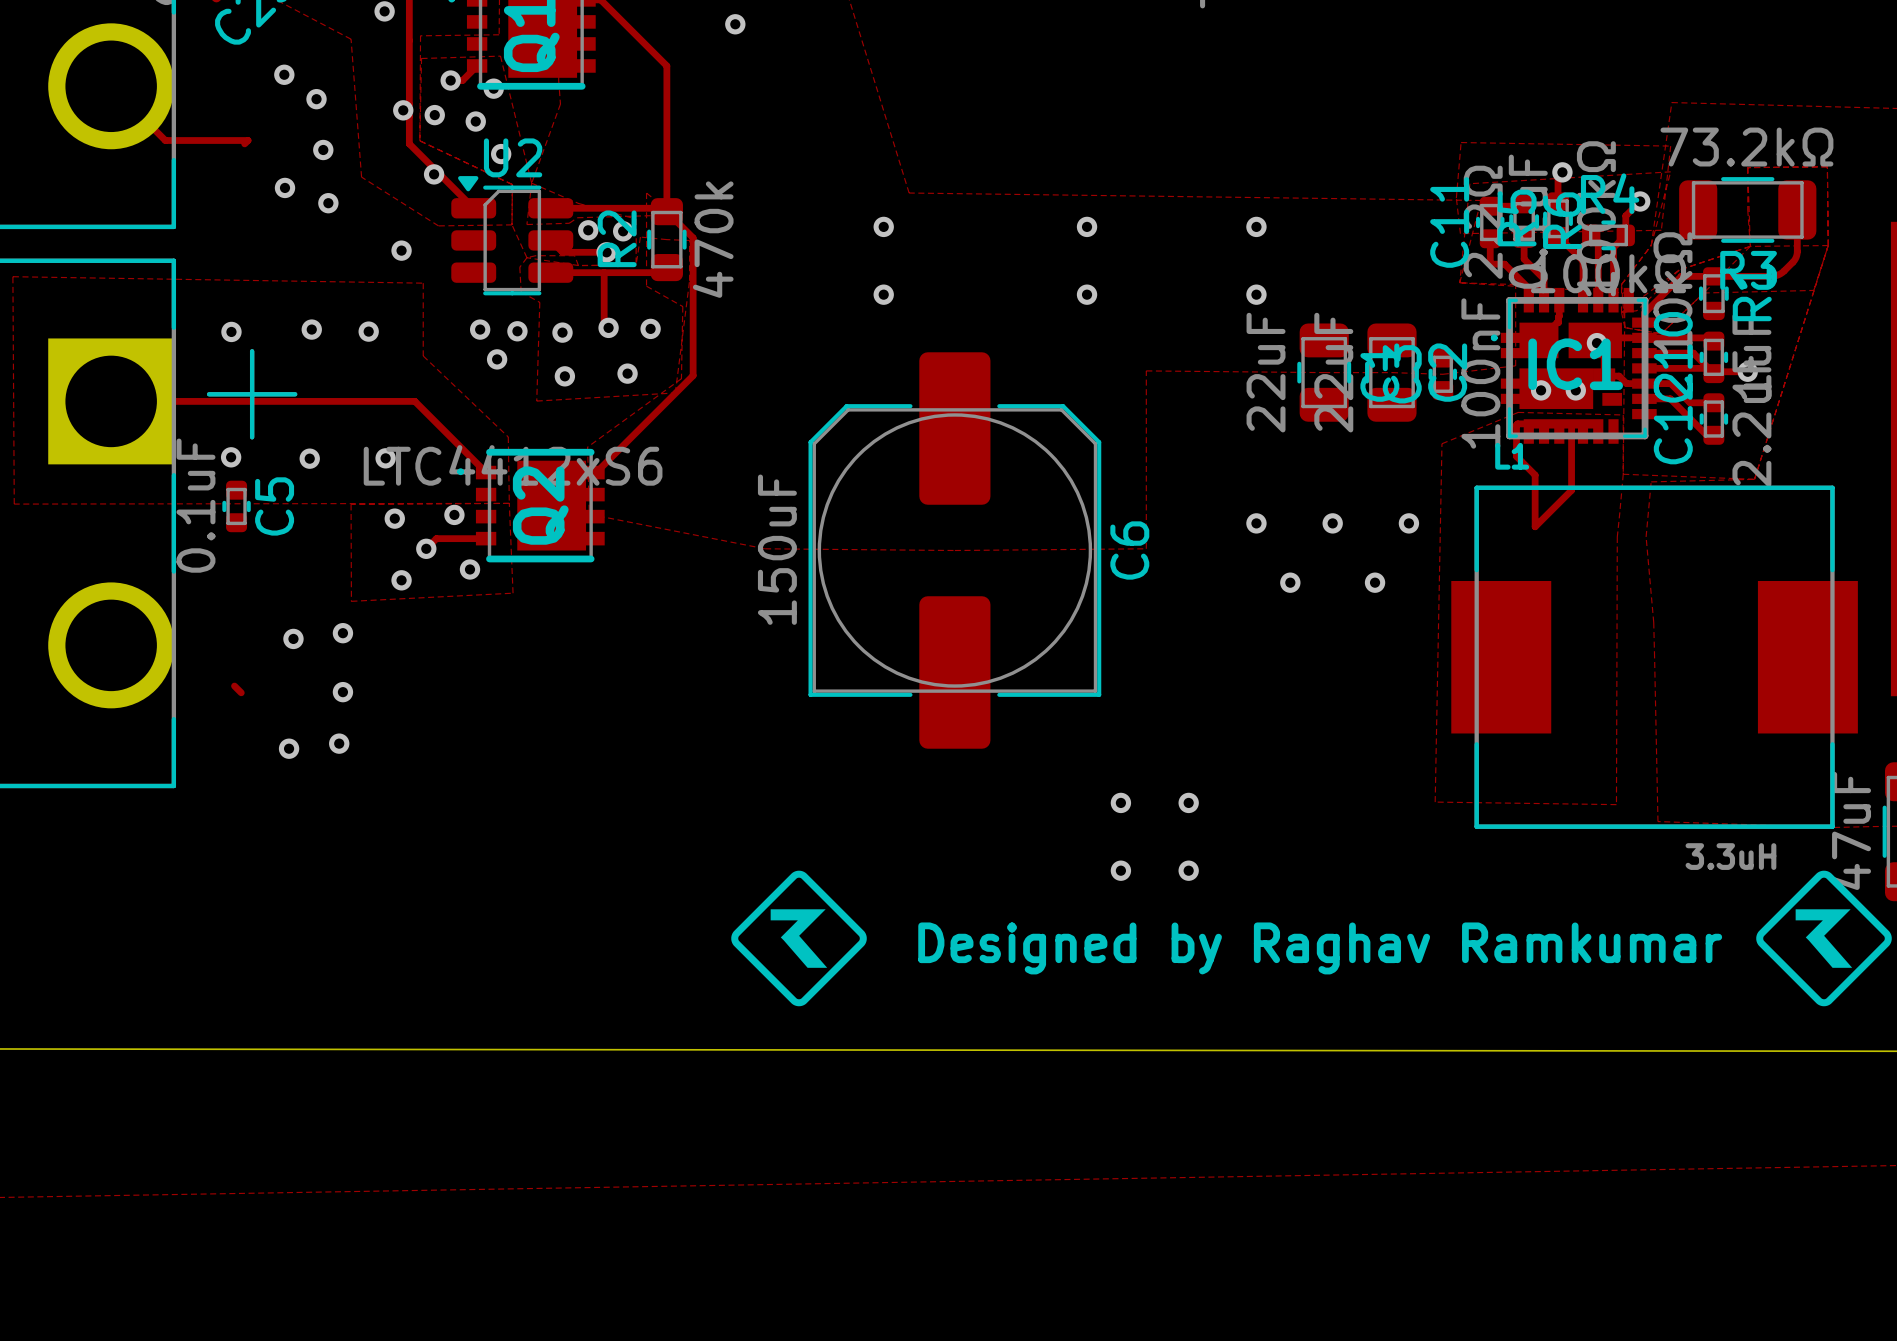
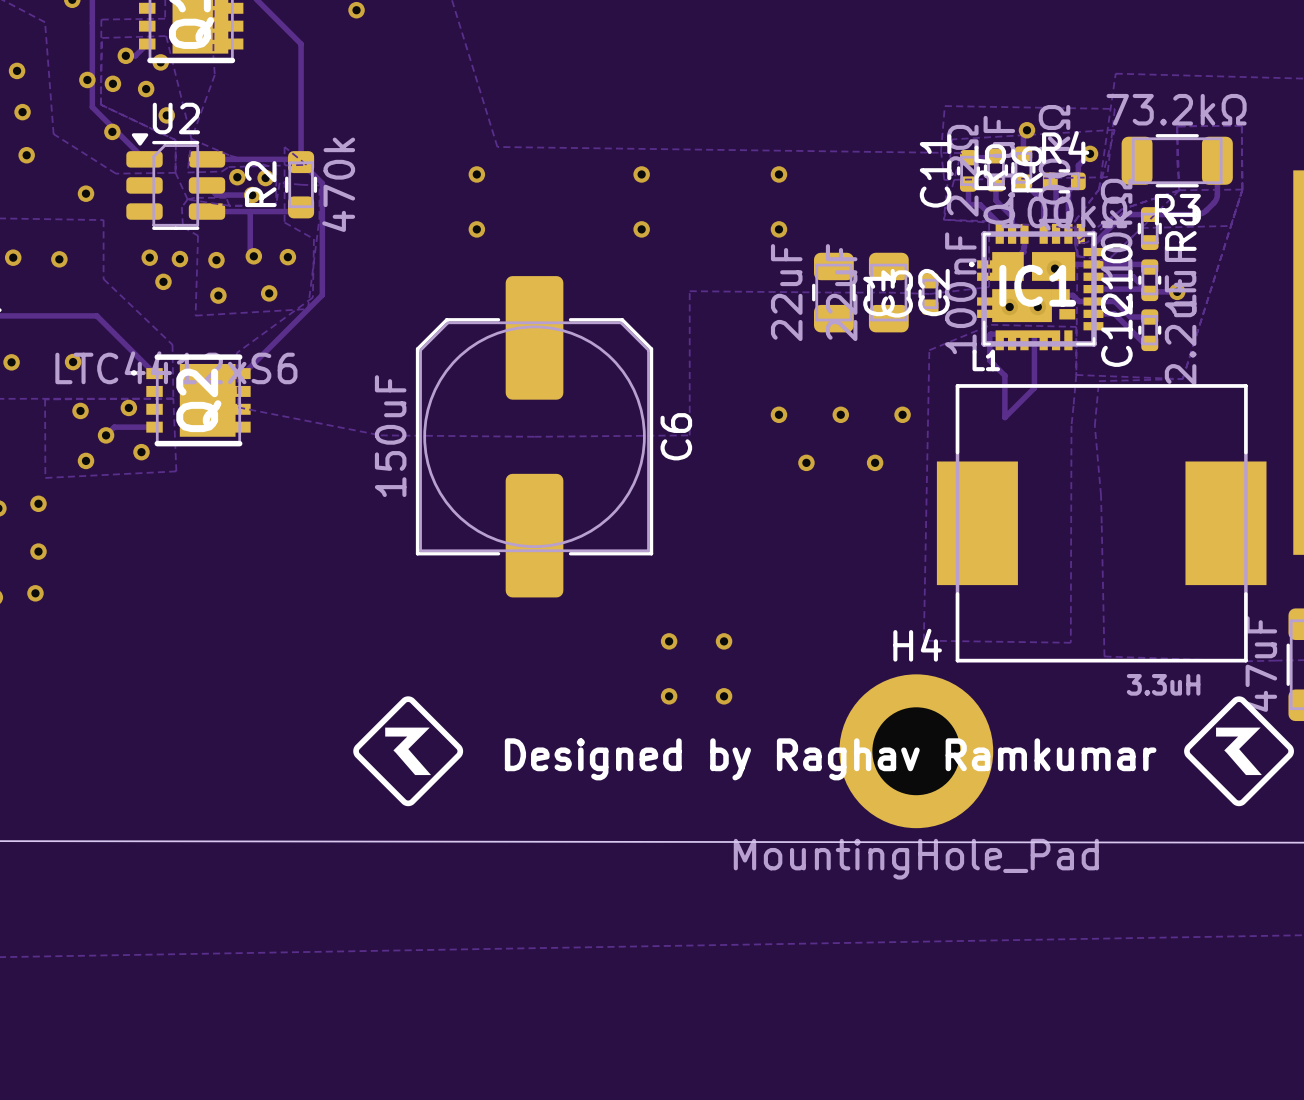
H4: none -> MountingHole_Pad (916, 751)

